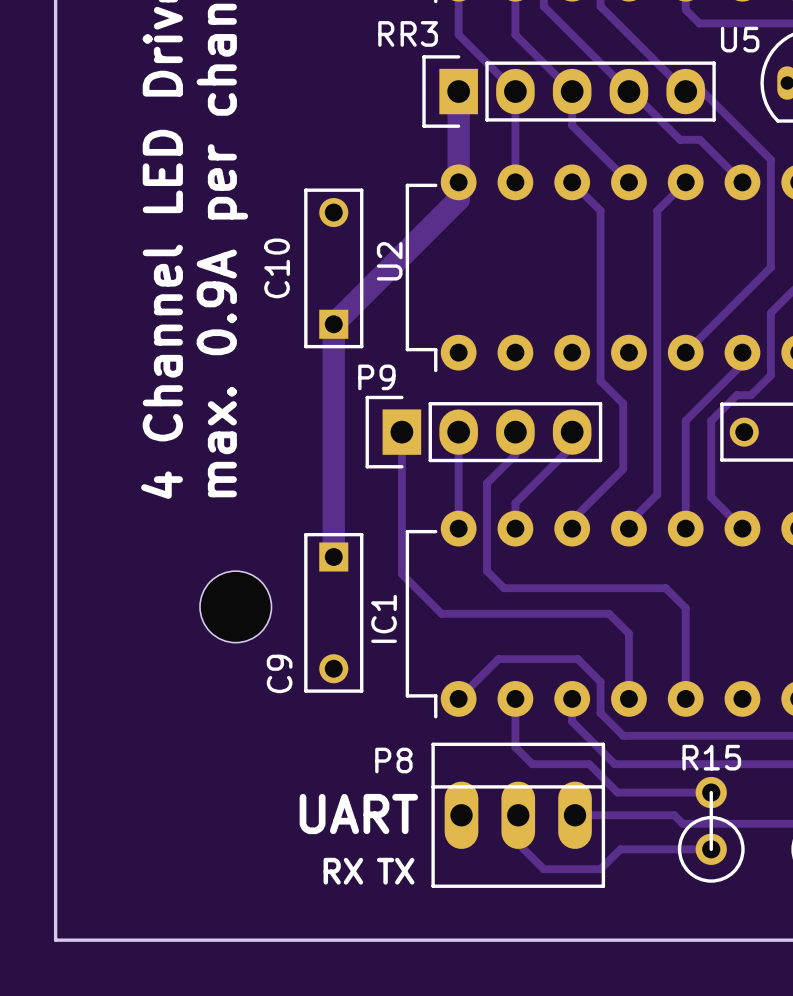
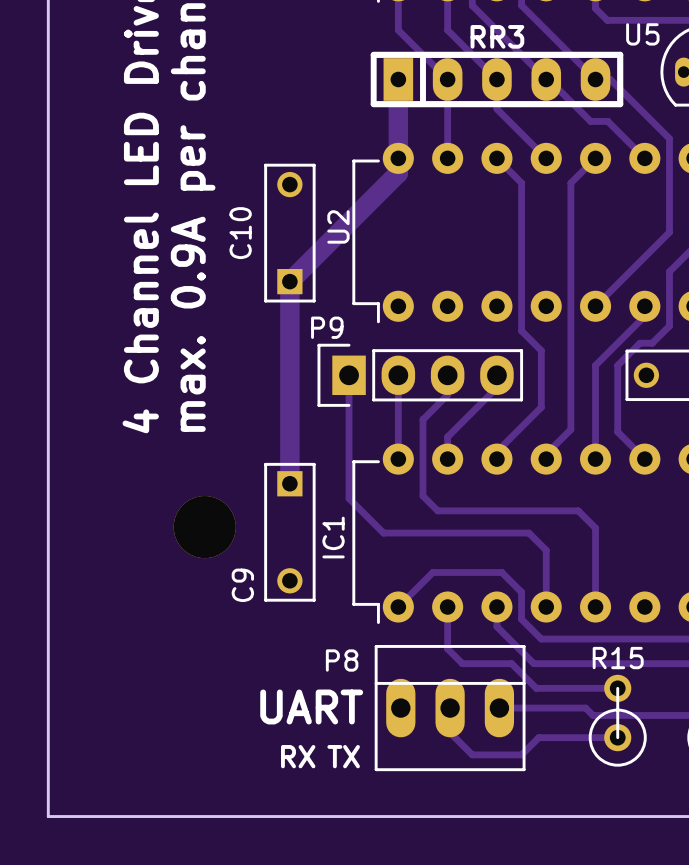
RR3 name position: RR3 (408, 33) -> RR3 (497, 36)
RR3 footprint: [422, 55, 716, 128] -> [370, 51, 624, 108]
part footprint: [200, 571, 272, 643] -> [173, 496, 236, 559]

